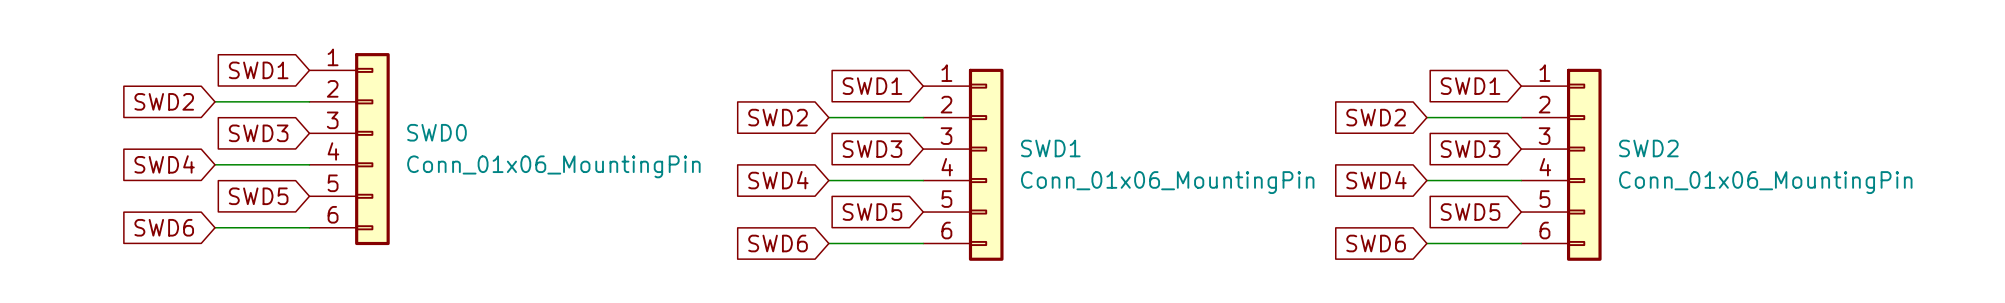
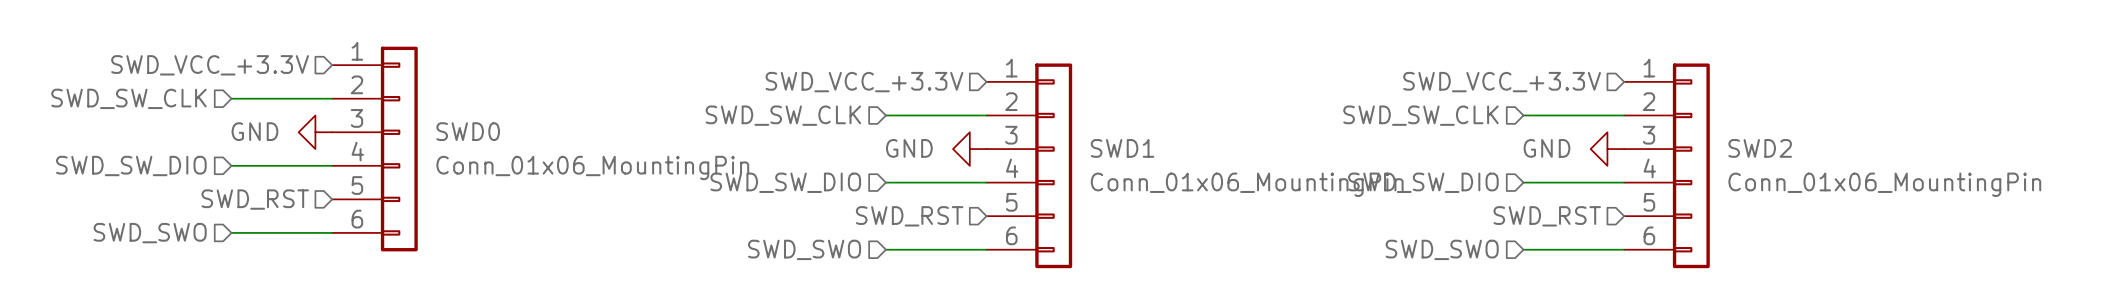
hierarchical label: none -> SWD_VCC_+3.3V (210, 65)
global label: SWD1 (258, 70) -> none
hierarchical label: none -> SWD_VCC_+3.3V (864, 82)
global label: SWD1 (872, 86) -> none
hierarchical label: none -> SWD_VCC_+3.3V (1502, 82)
global label: SWD1 (1470, 86) -> none
global label: SWD2 (164, 101) -> none
hierarchical label: none -> SWD_SW_CLK (128, 98)
hierarchical label: none -> SWD_SW_CLK (783, 115)
global label: SWD2 (778, 117) -> none
hierarchical label: none -> SWD_SW_CLK (1421, 115)
global label: SWD2 (1376, 117) -> none
global label: SWD3 (258, 133) -> none
power symbol: none -> GND (315, 132)
global label: SWD3 (872, 149) -> none
power symbol: none -> GND (969, 149)
global label: SWD3 (1470, 149) -> none
power symbol: none -> GND (1607, 149)
hierarchical label: none -> SWD_SW_DIO (131, 165)
global label: SWD4 (164, 164) -> none
hierarchical label: none -> SWD_SW_DIO (785, 182)
global label: SWD4 (778, 180) -> none
hierarchical label: none -> SWD_SW_DIO (1423, 182)
global label: SWD4 (1376, 180) -> none
hierarchical label: none -> SWD_RST (255, 199)
global label: SWD5 (258, 196) -> none
hierarchical label: none -> SWD_RST (909, 216)
global label: SWD5 (872, 212) -> none
hierarchical label: none -> SWD_RST (1547, 216)
global label: SWD5 (1470, 212) -> none
hierarchical label: none -> SWD_SWO (150, 233)
global label: SWD6 (164, 227) -> none
hierarchical label: none -> SWD_SWO (804, 249)
global label: SWD6 (778, 243) -> none
hierarchical label: none -> SWD_SWO (1442, 249)
global label: SWD6 (1376, 243) -> none

